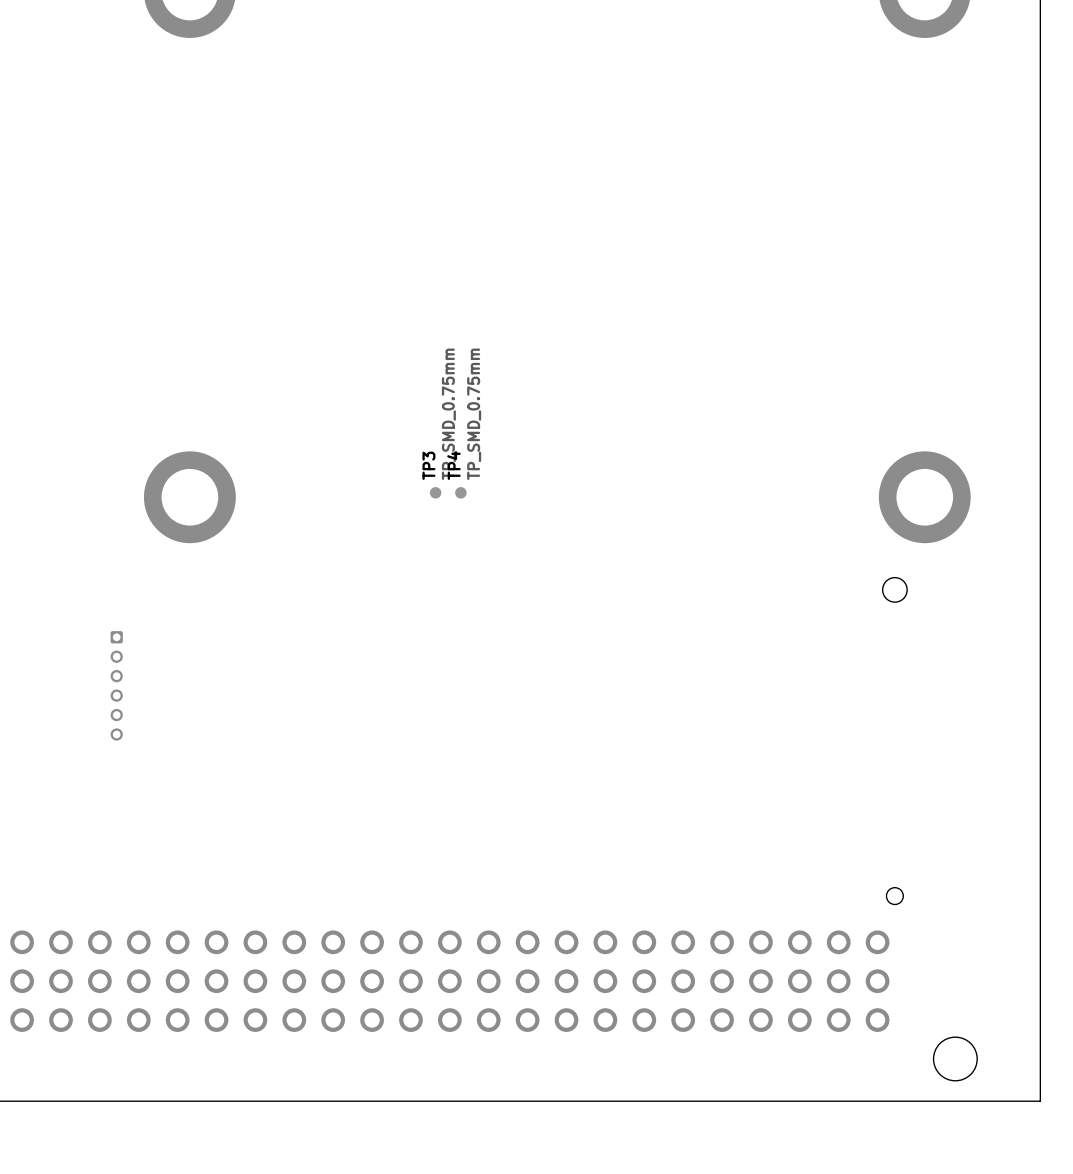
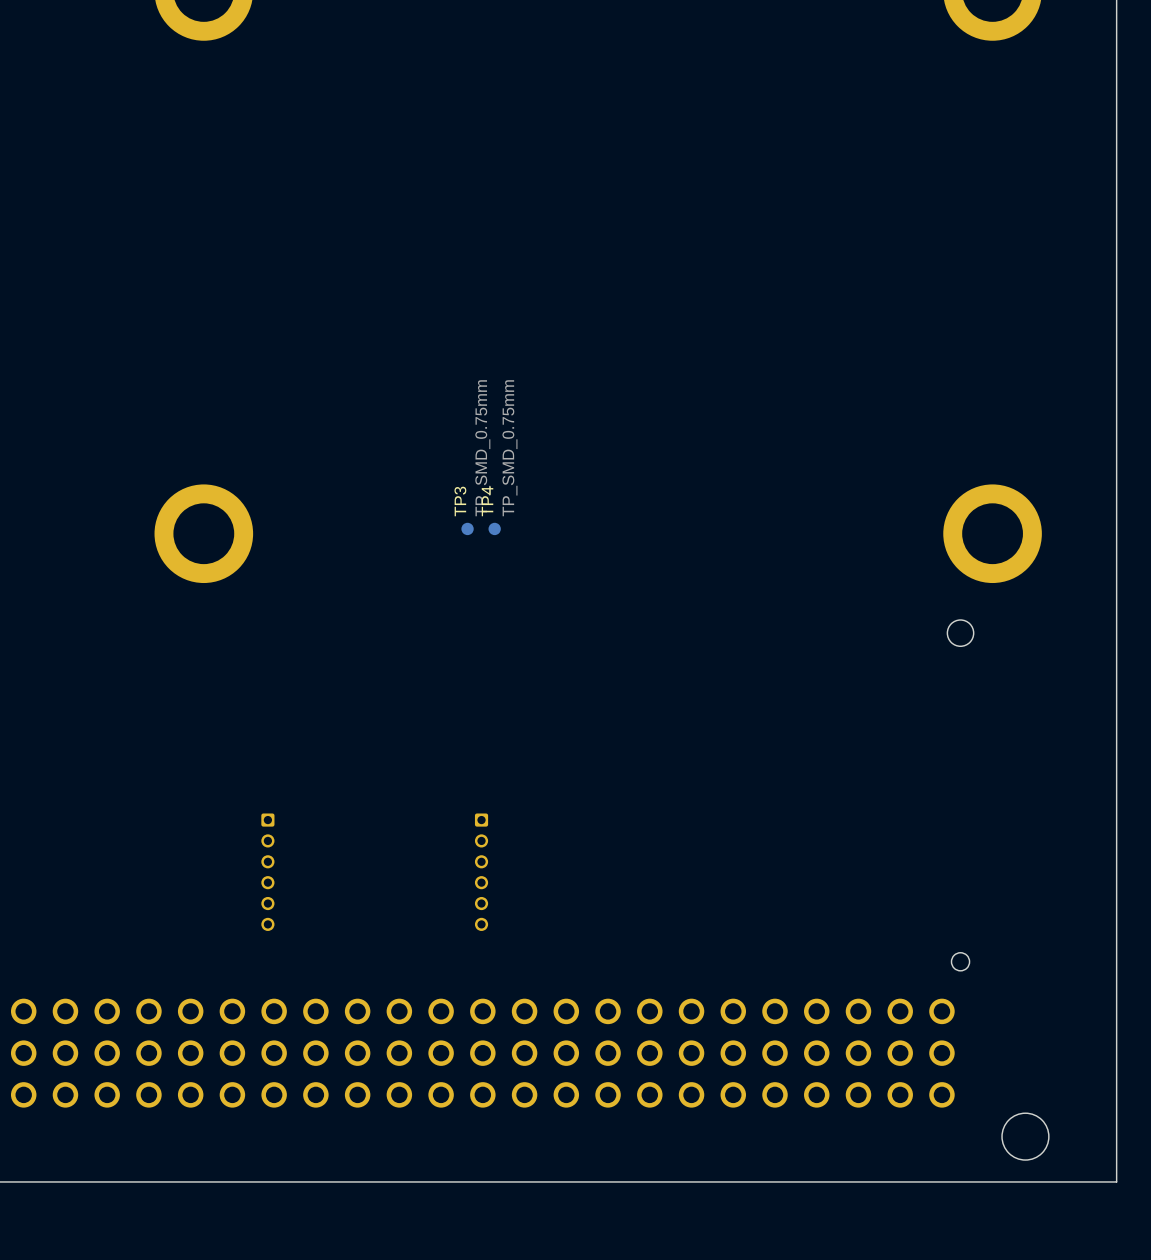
part: (116, 685) -> none
part: none -> (267, 872)
part: none -> (481, 872)

